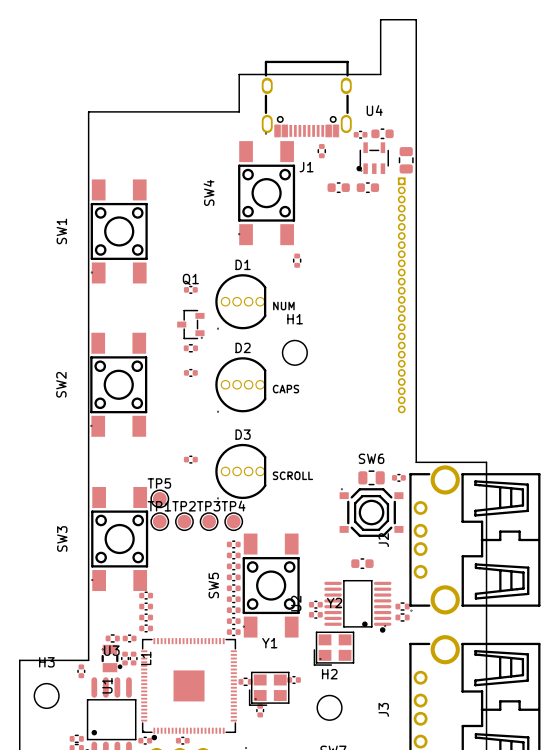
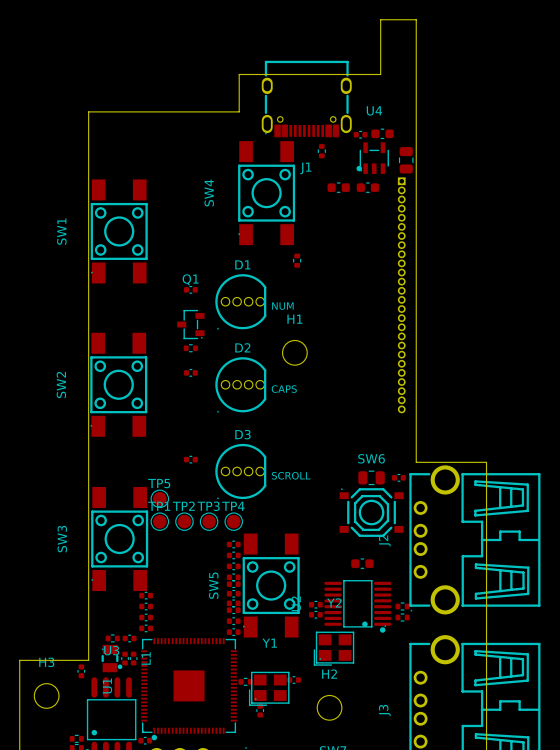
part: none -> (233, 584)
part: (233, 588) -> none
part: none -> (233, 593)
part: (233, 599) -> none
part: none -> (233, 603)
part: (182, 740) -> none

